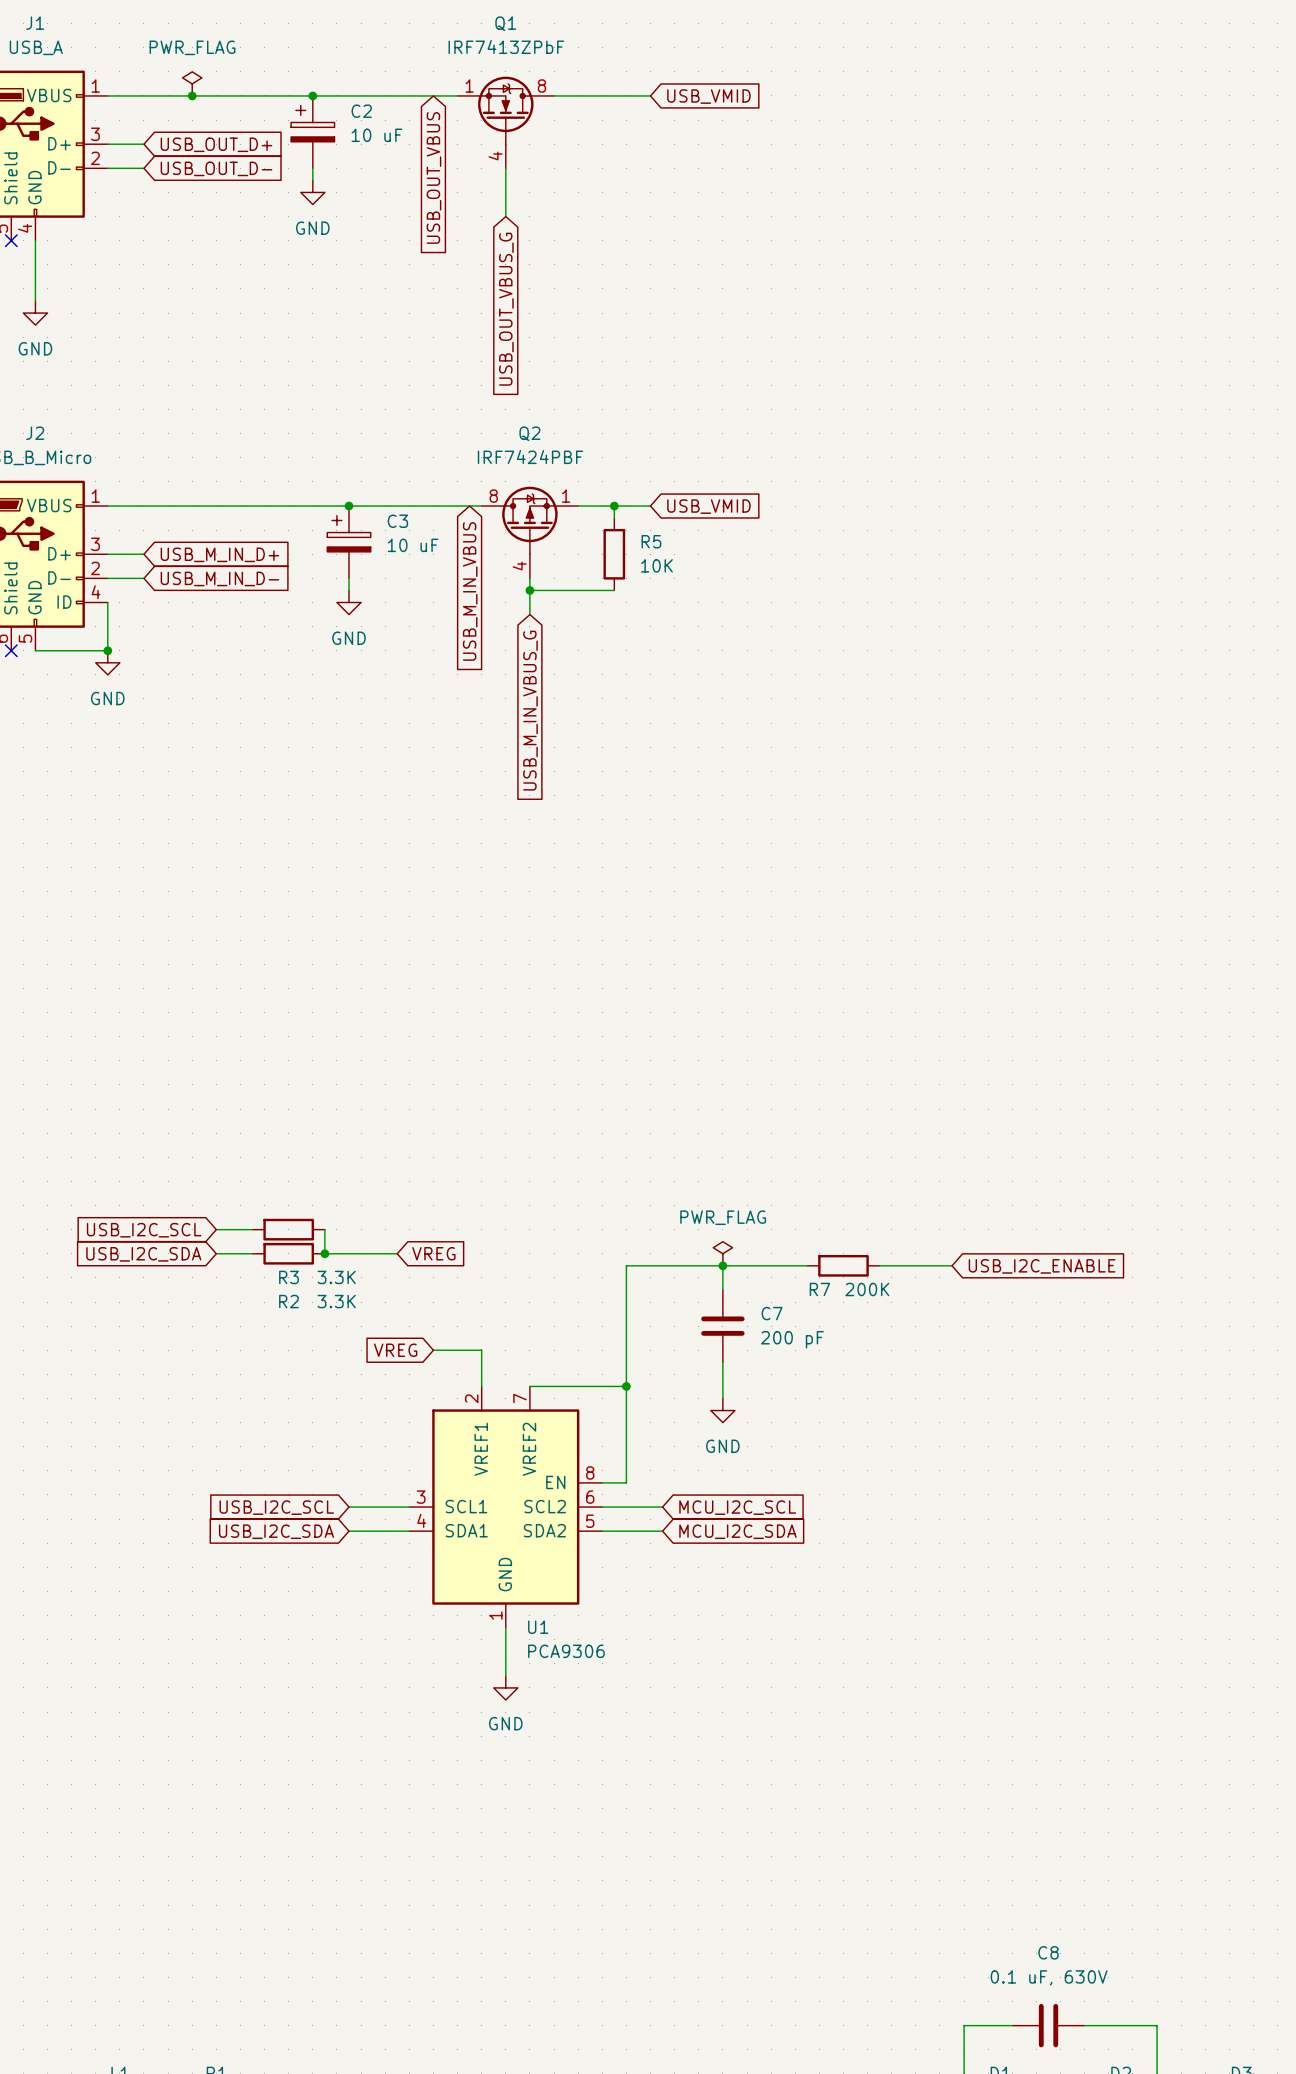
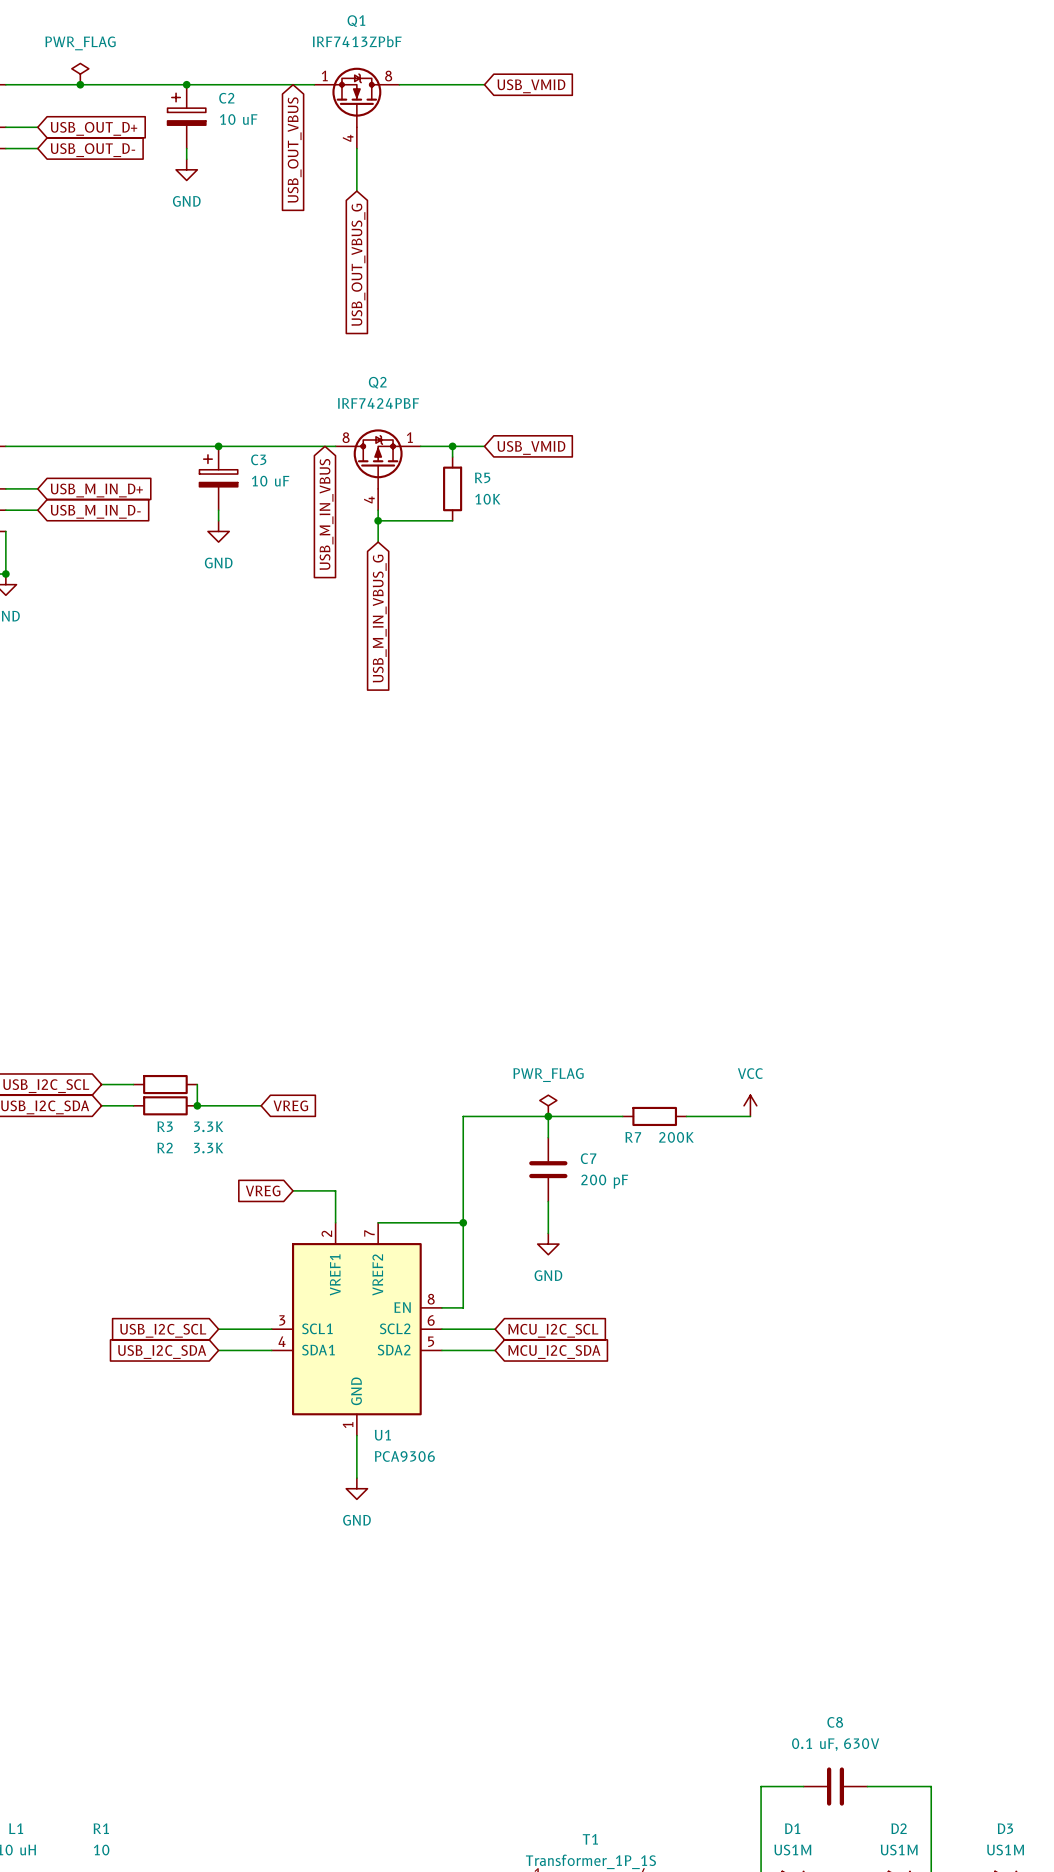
power symbol: none -> VCC (750, 1105)
global label: USB_I2C_ENABLE (1042, 1266) -> none

